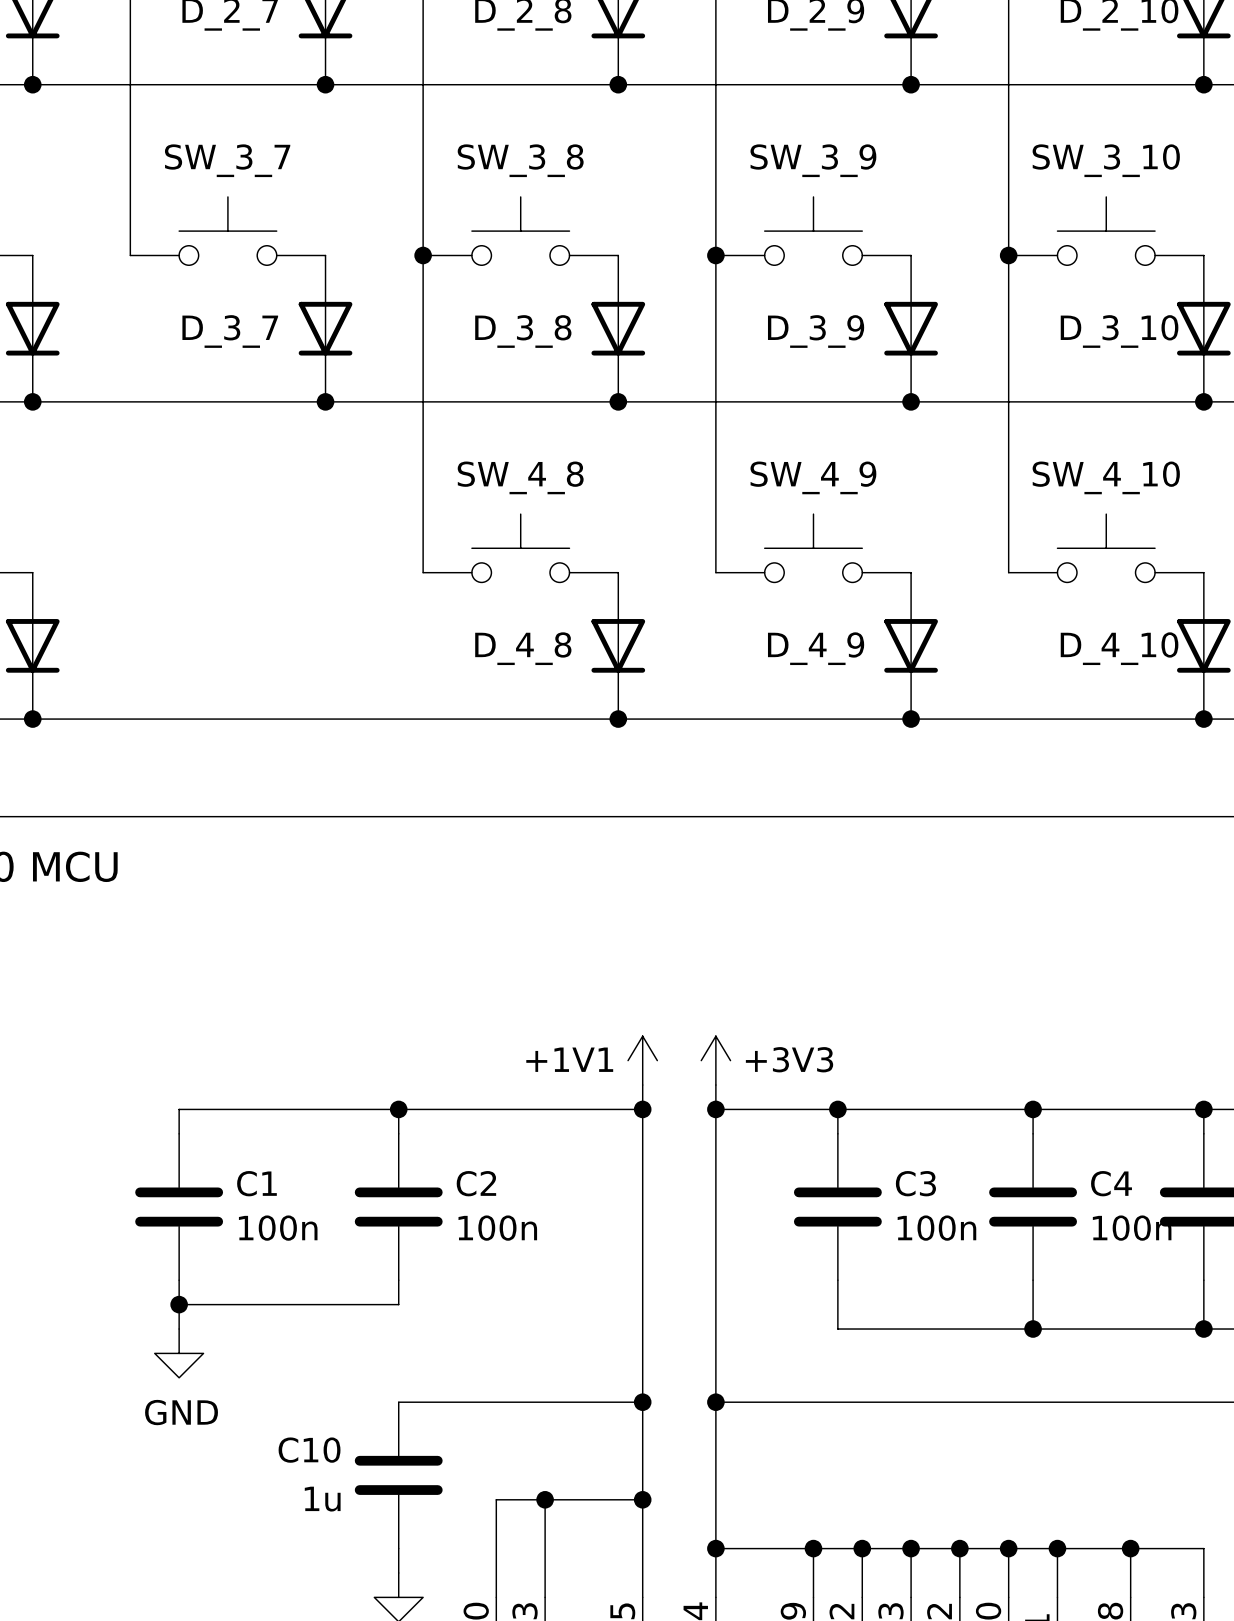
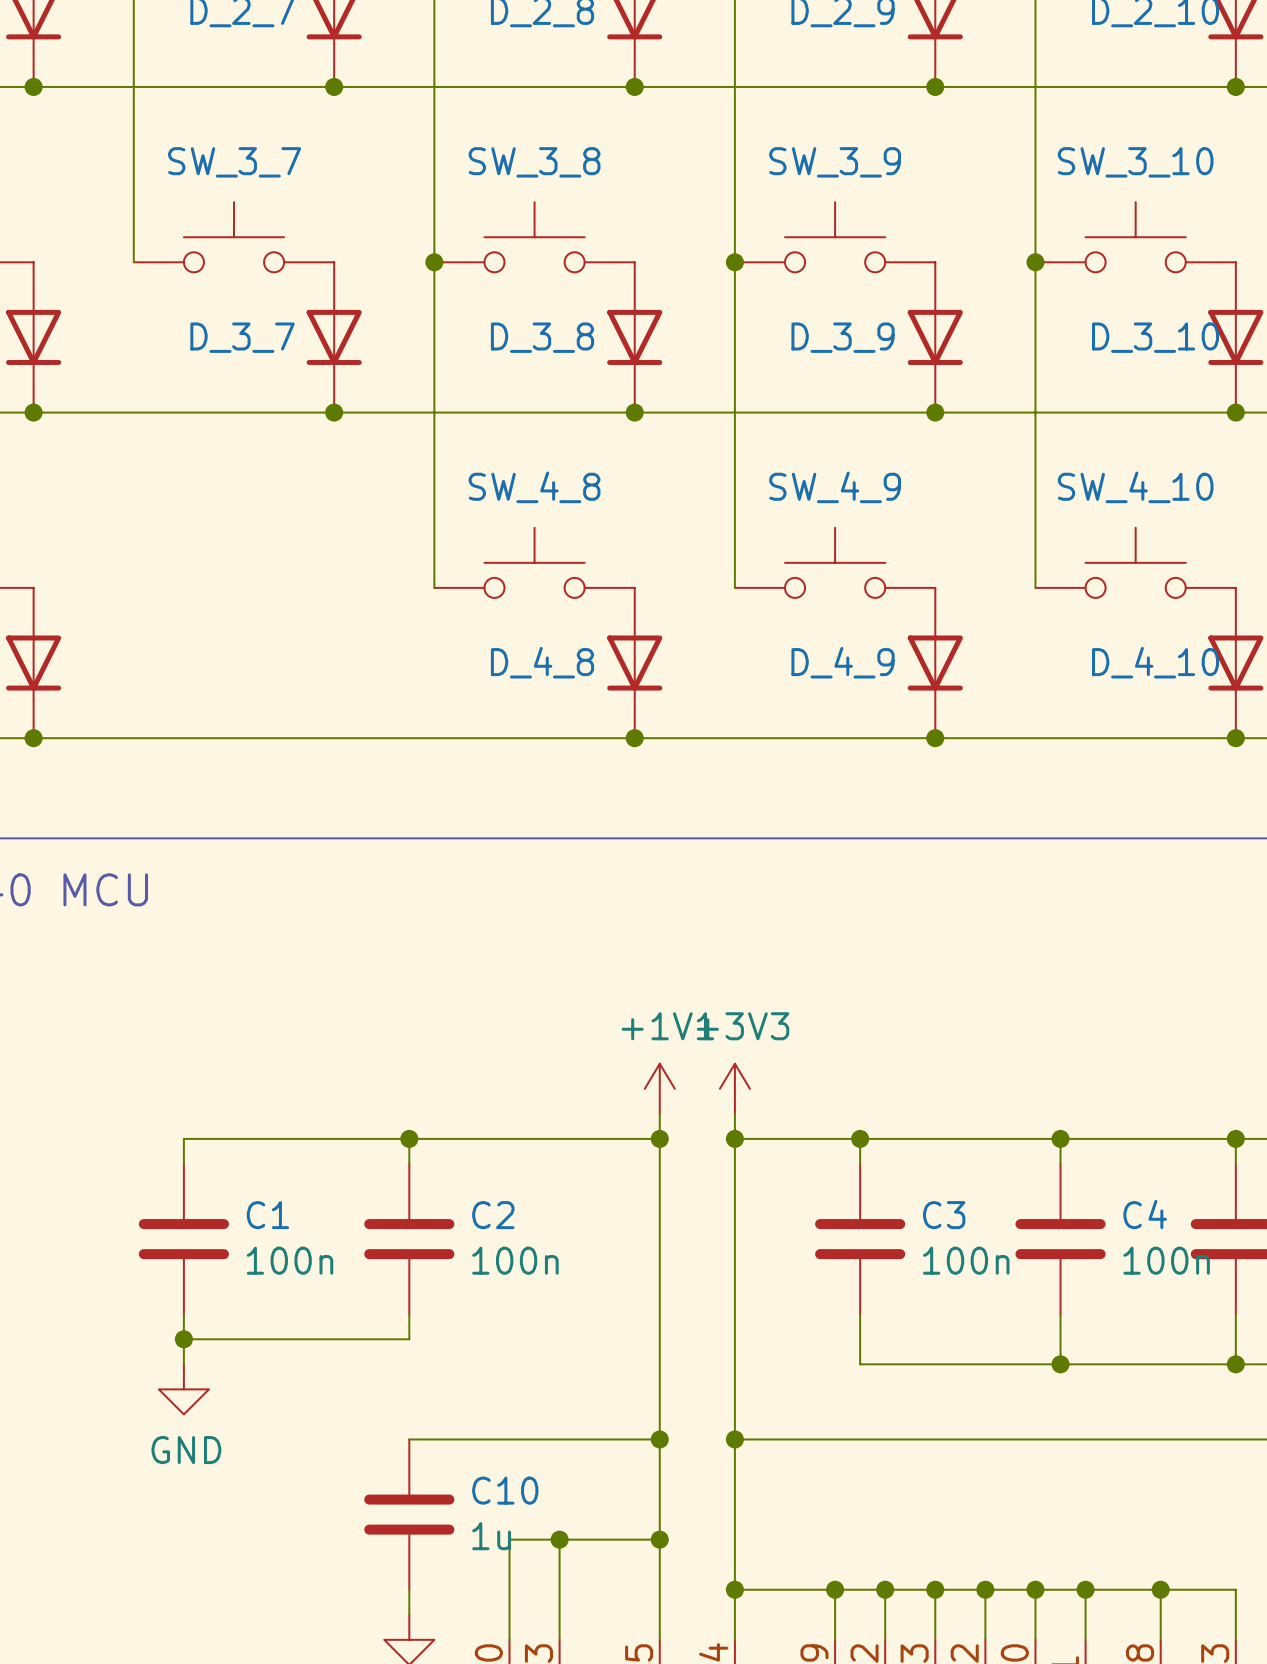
power symbol text position: +1V1 (569, 1059) -> +1V1 (667, 1026)
power symbol text position: +3V3 (789, 1059) -> +3V3 (743, 1026)
C10 name position: C10 (309, 1450) -> C10 (505, 1490)
C10 value position: 1u (322, 1499) -> 1u (491, 1536)

